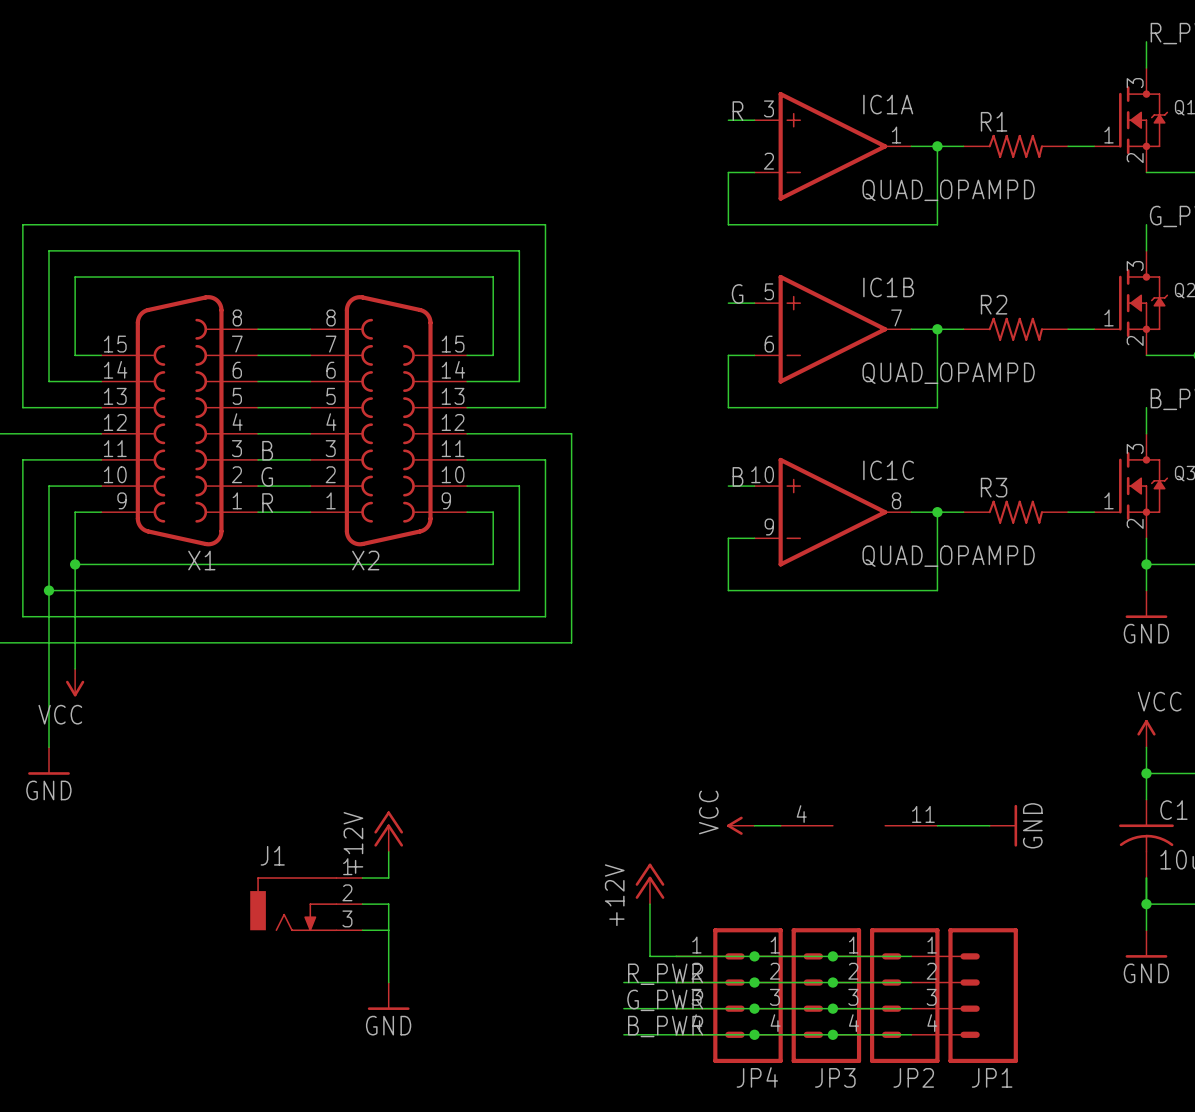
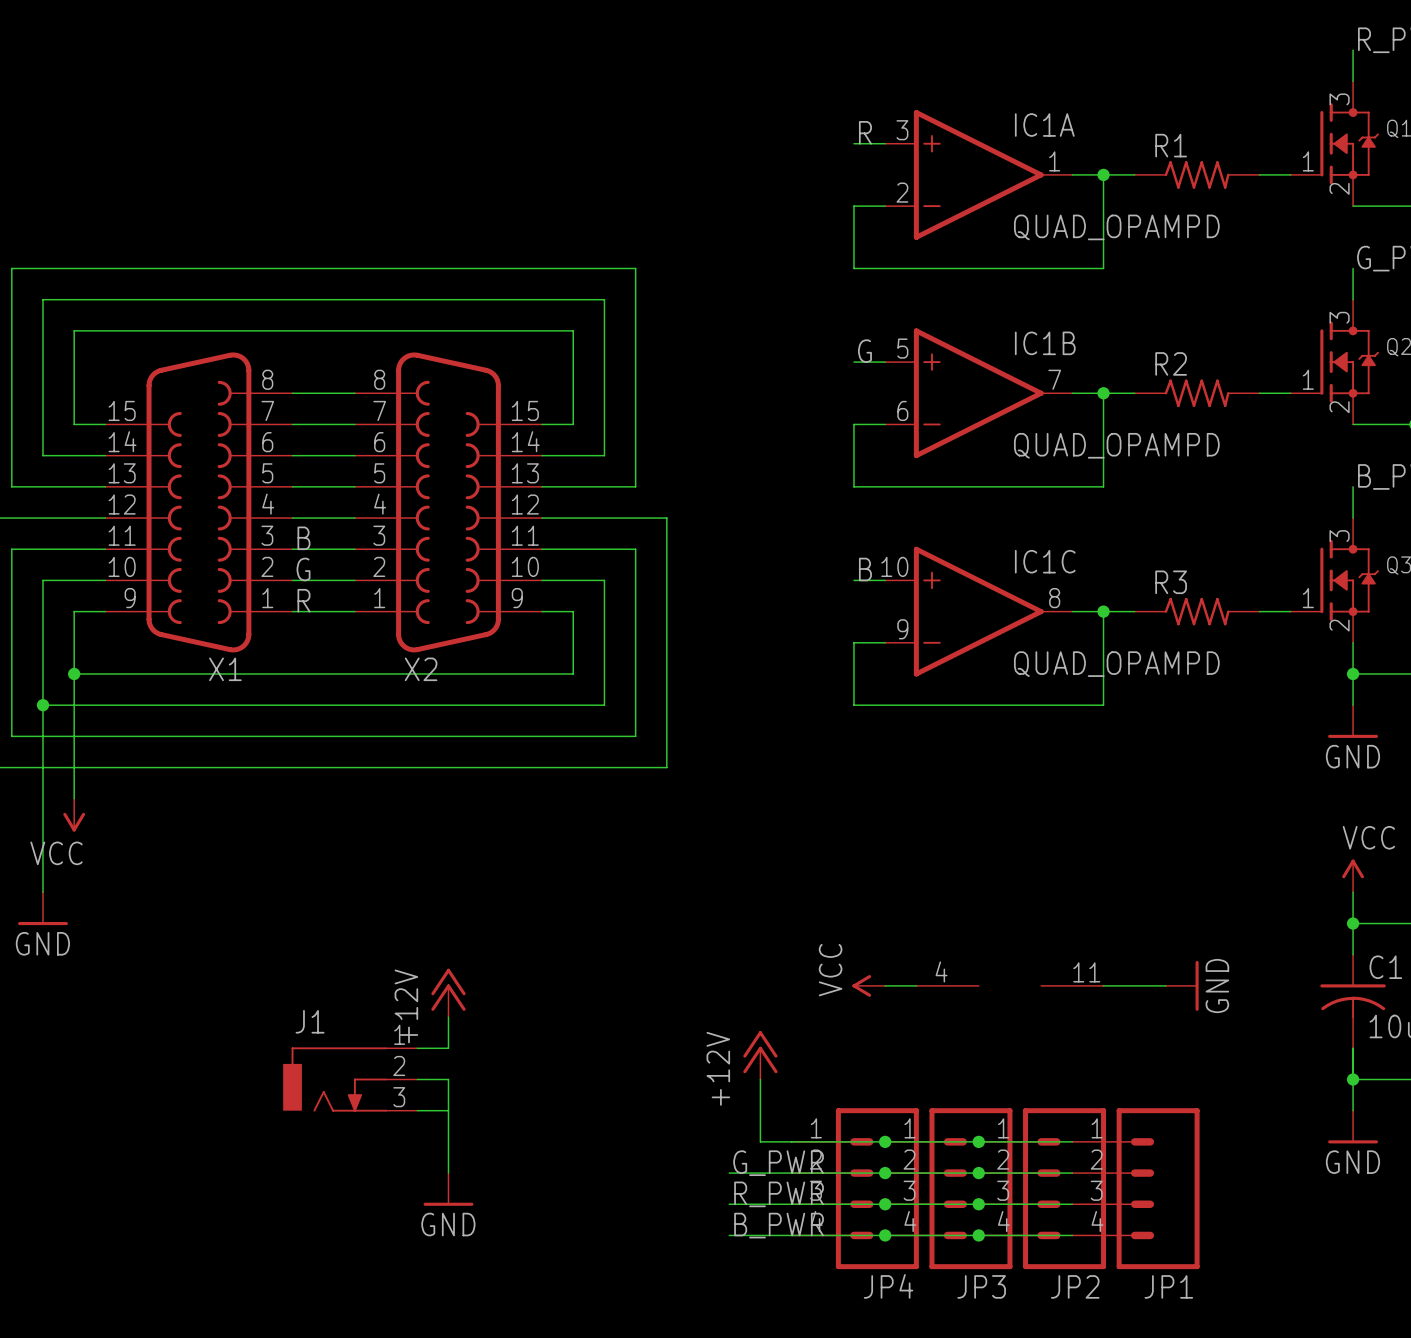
label: R_PWR (665, 974) -> G_PWR (778, 1163)
label: G_PWR (665, 1000) -> R_PWR (779, 1194)

